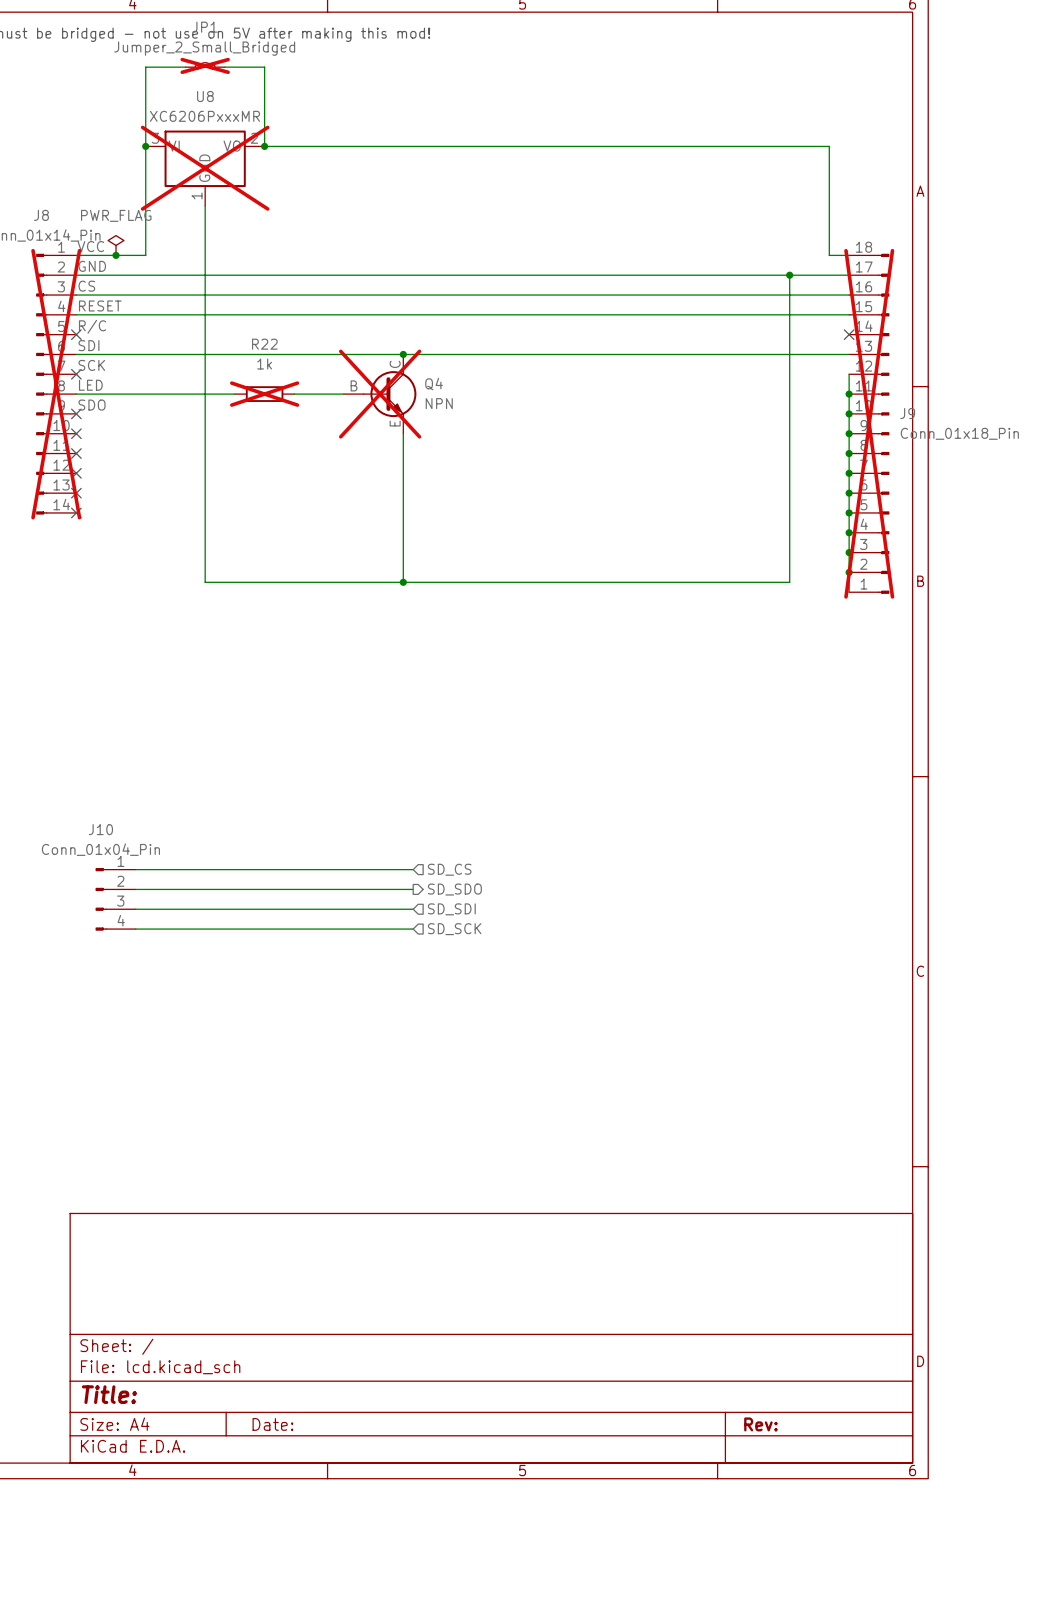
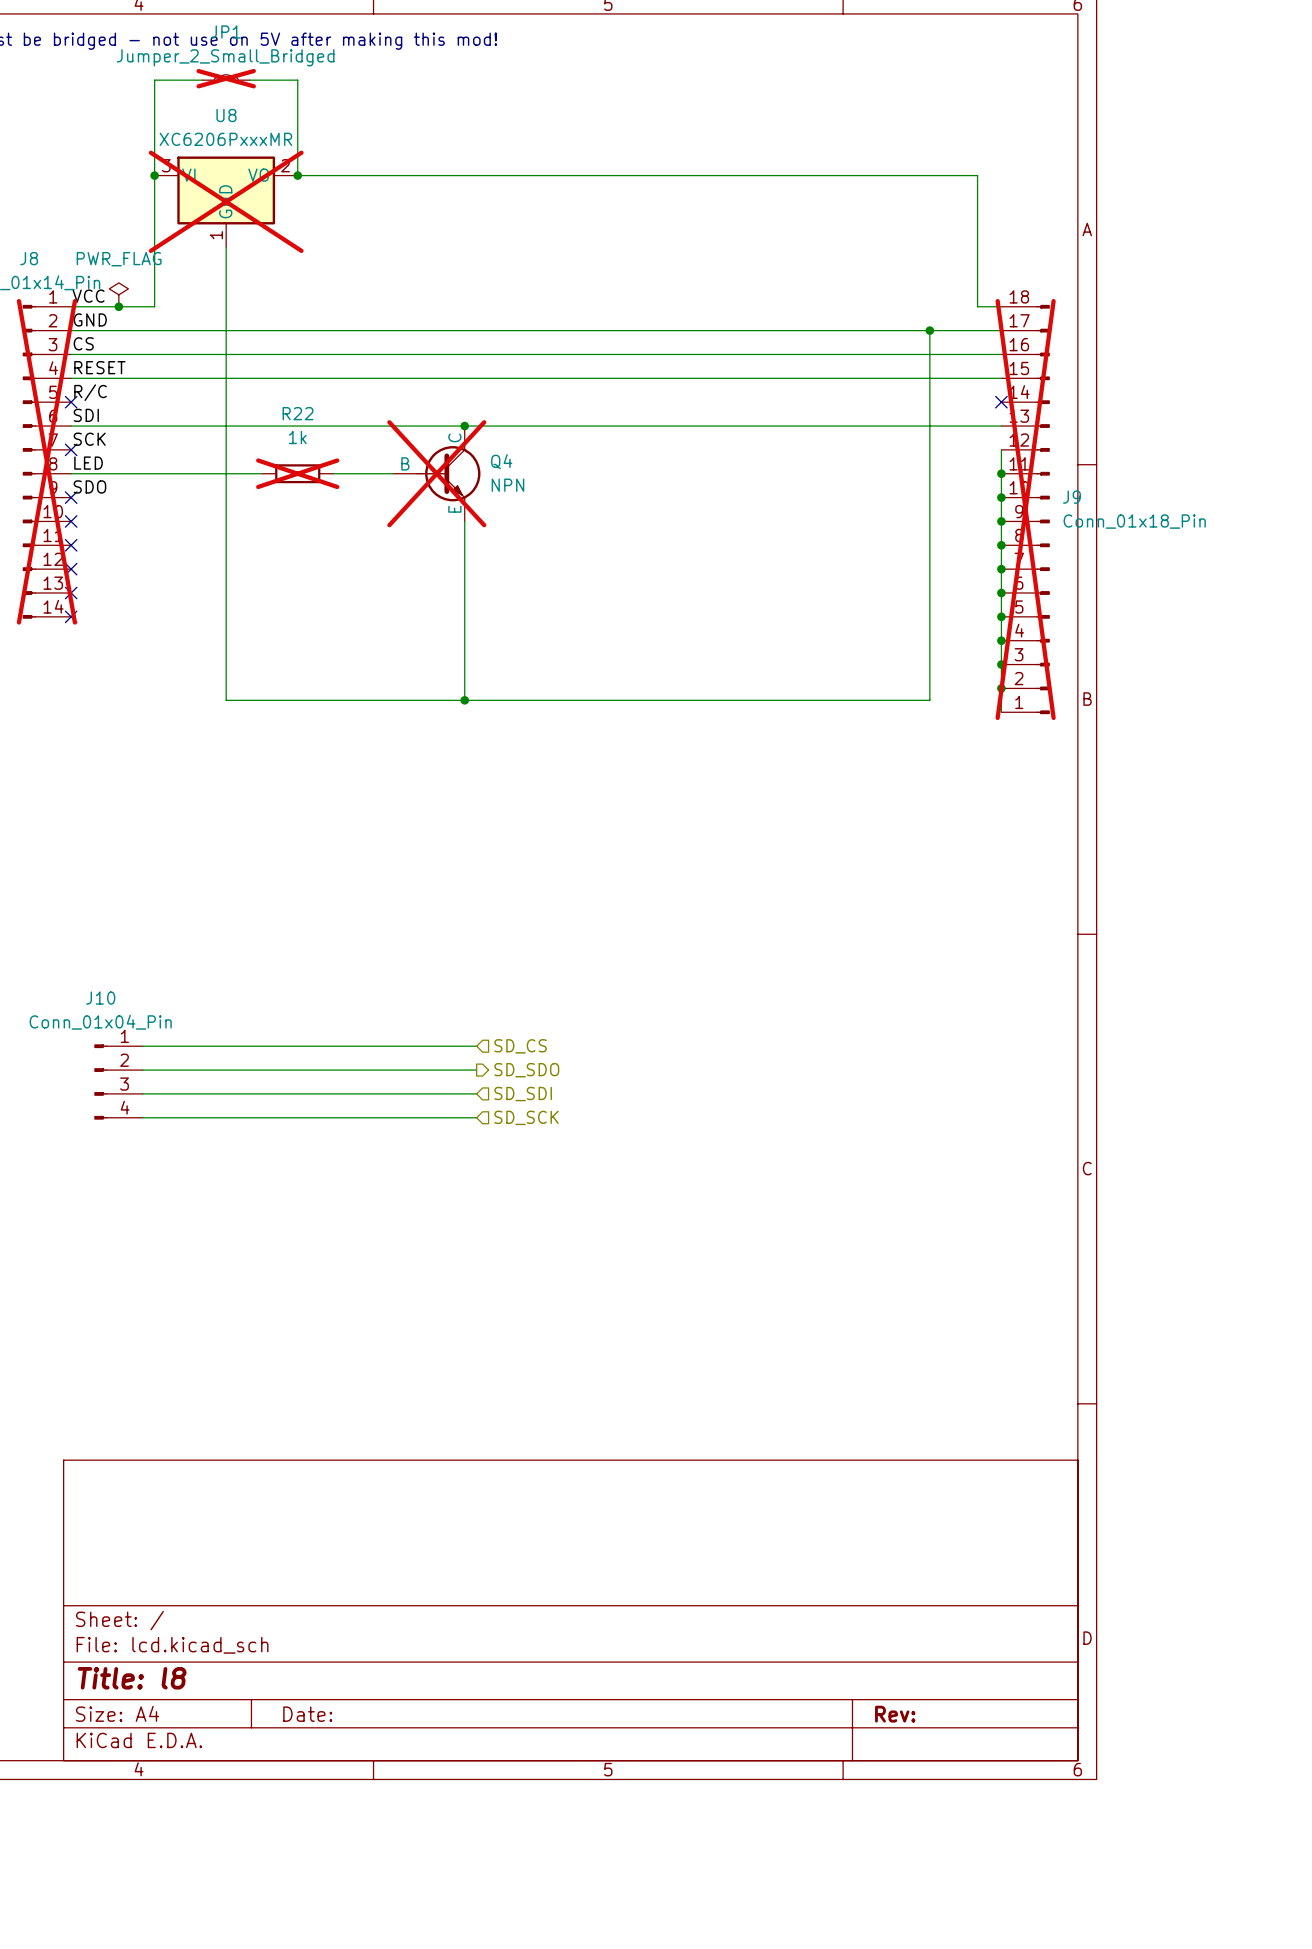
title block: Title: (109, 1394) -> Title: l8 (132, 1678)

